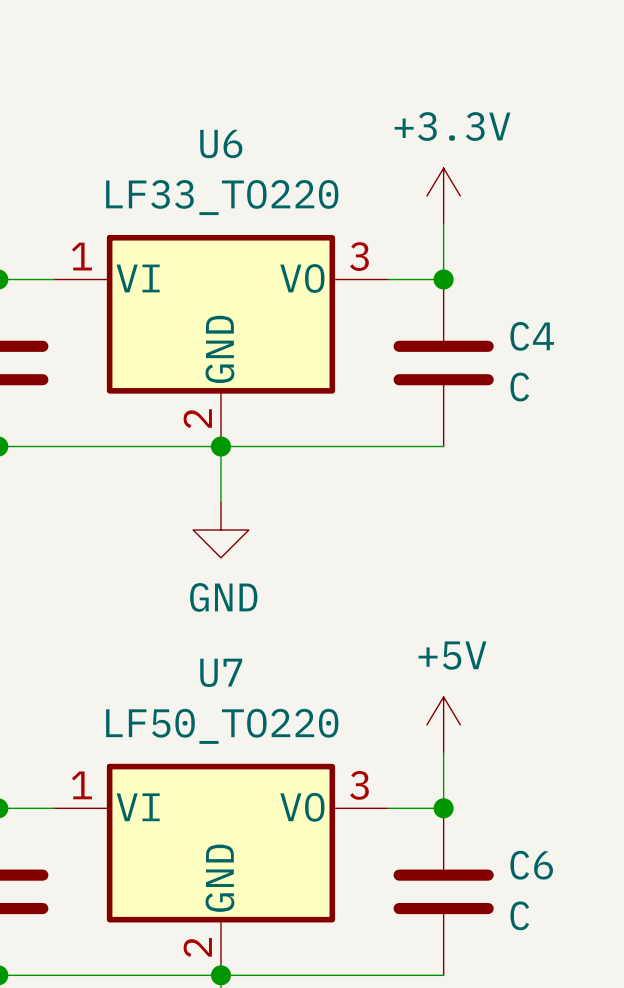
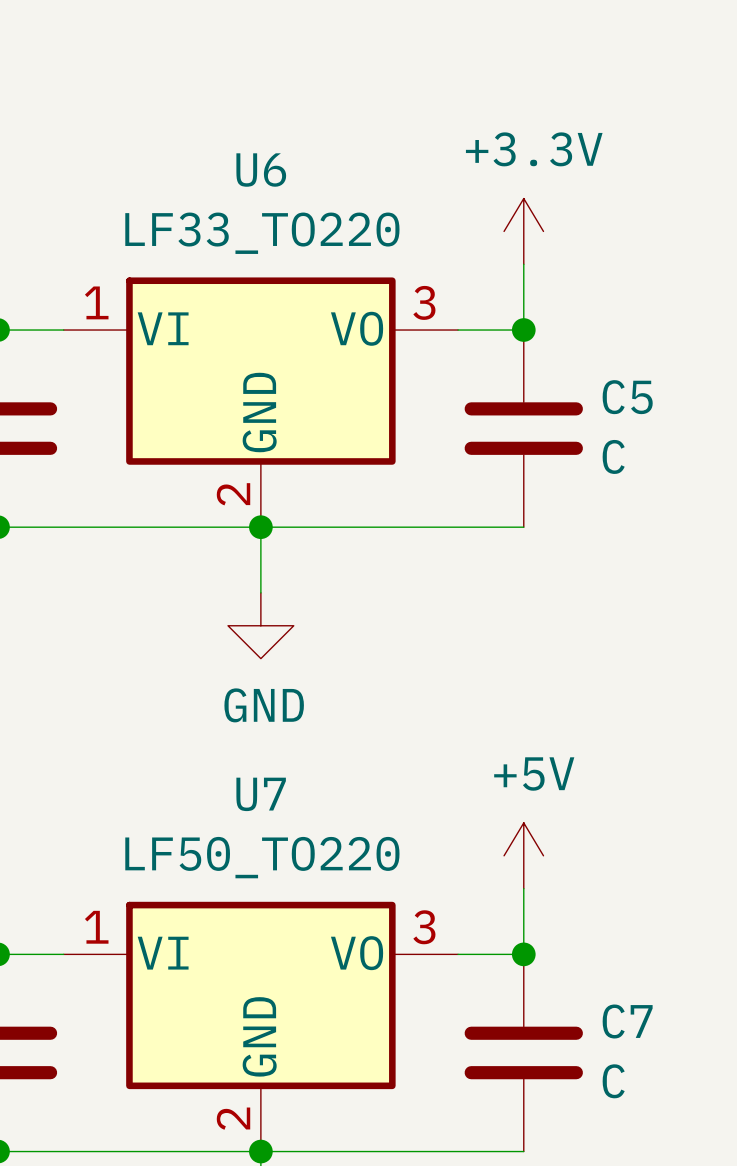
C4 name: C4 (532, 336) -> C5 (627, 397)
C6 name: C6 (531, 865) -> C7 (627, 1021)

